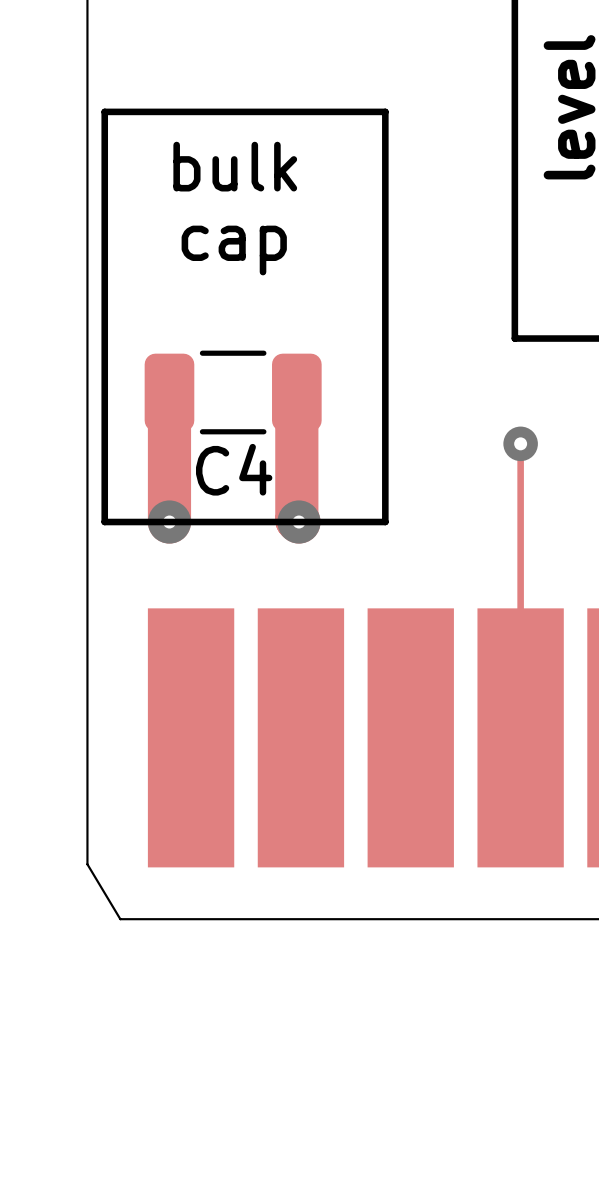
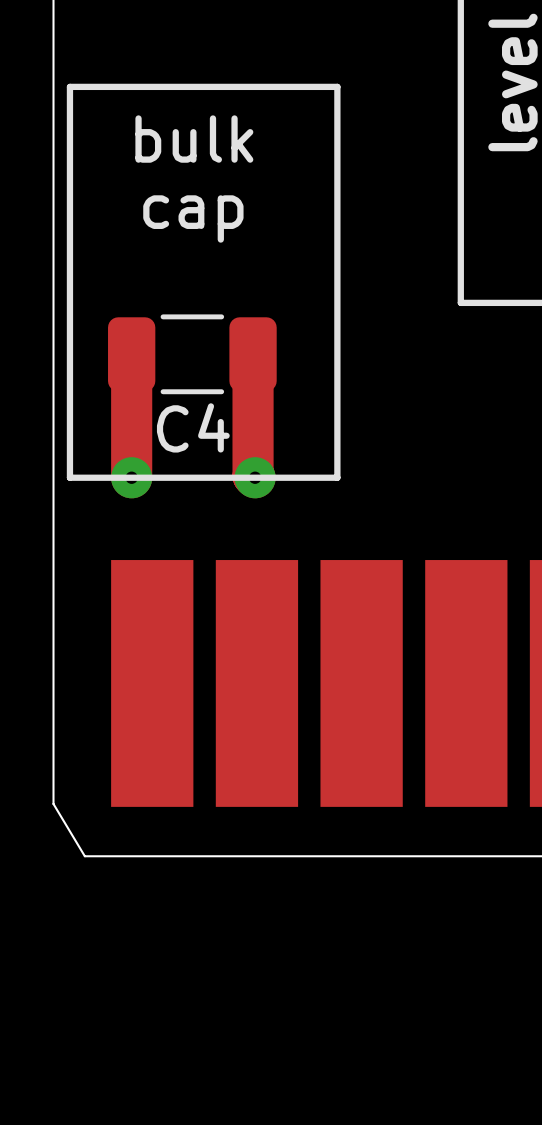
track: (520, 443) (520, 737) -> none
via: (520, 443) -> none

